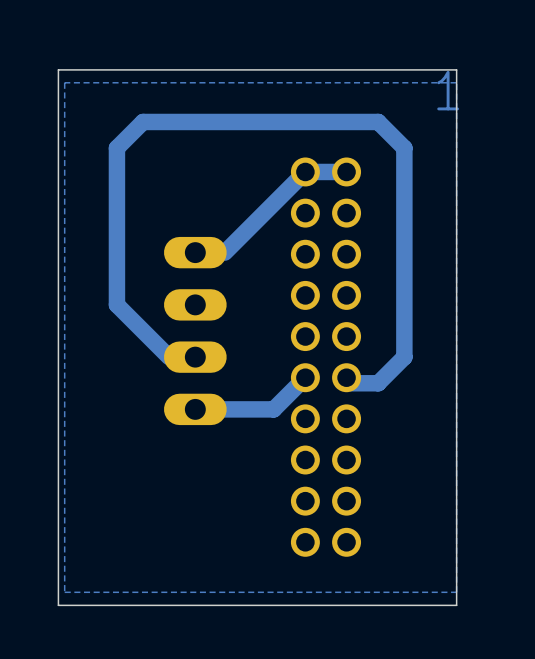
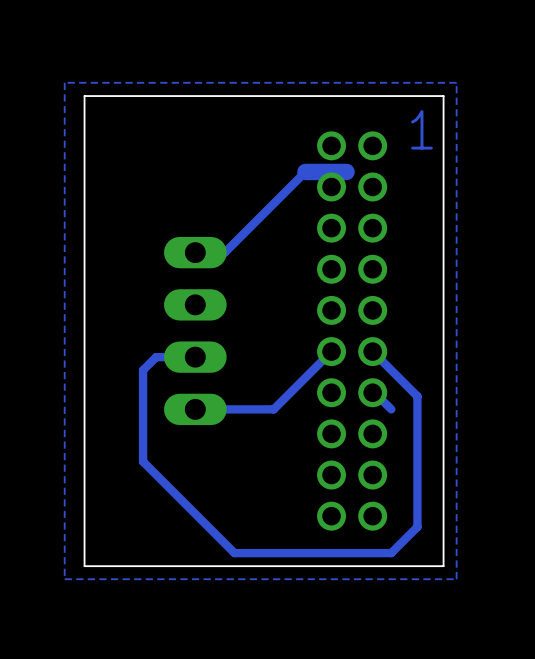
board edge: (456, 69) (58, 69) (58, 605) (456, 605) (456, 69) -> (443, 96) (443, 566) (84, 566) (84, 96) (443, 96)
text position: 1 (448, 90) -> 1 (421, 129)
bottom track width: thick (305, 171) (224, 252) -> thin (305, 171) (224, 252)
bottom track: none -> (331, 351) (305, 377)
bottom track: (169, 357) (116, 304) (116, 148) (143, 121) (378, 121) (404, 148) (404, 357) (378, 383) (352, 383) (346, 377) -> (169, 357) (156, 357) (143, 370) (143, 461) (234, 553) (391, 553) (417, 526) (417, 396) (372, 351)
part position: (325, 357) -> (352, 331)
bottom track width: thick (305, 377) (273, 409) (195, 409) -> thin (305, 377) (273, 409) (195, 409)
bottom track: none -> (372, 392) (391, 409)
bottom zone outline: (456, 579) (456, 592) (64, 592) (64, 579) -> (456, 579) (64, 579)

